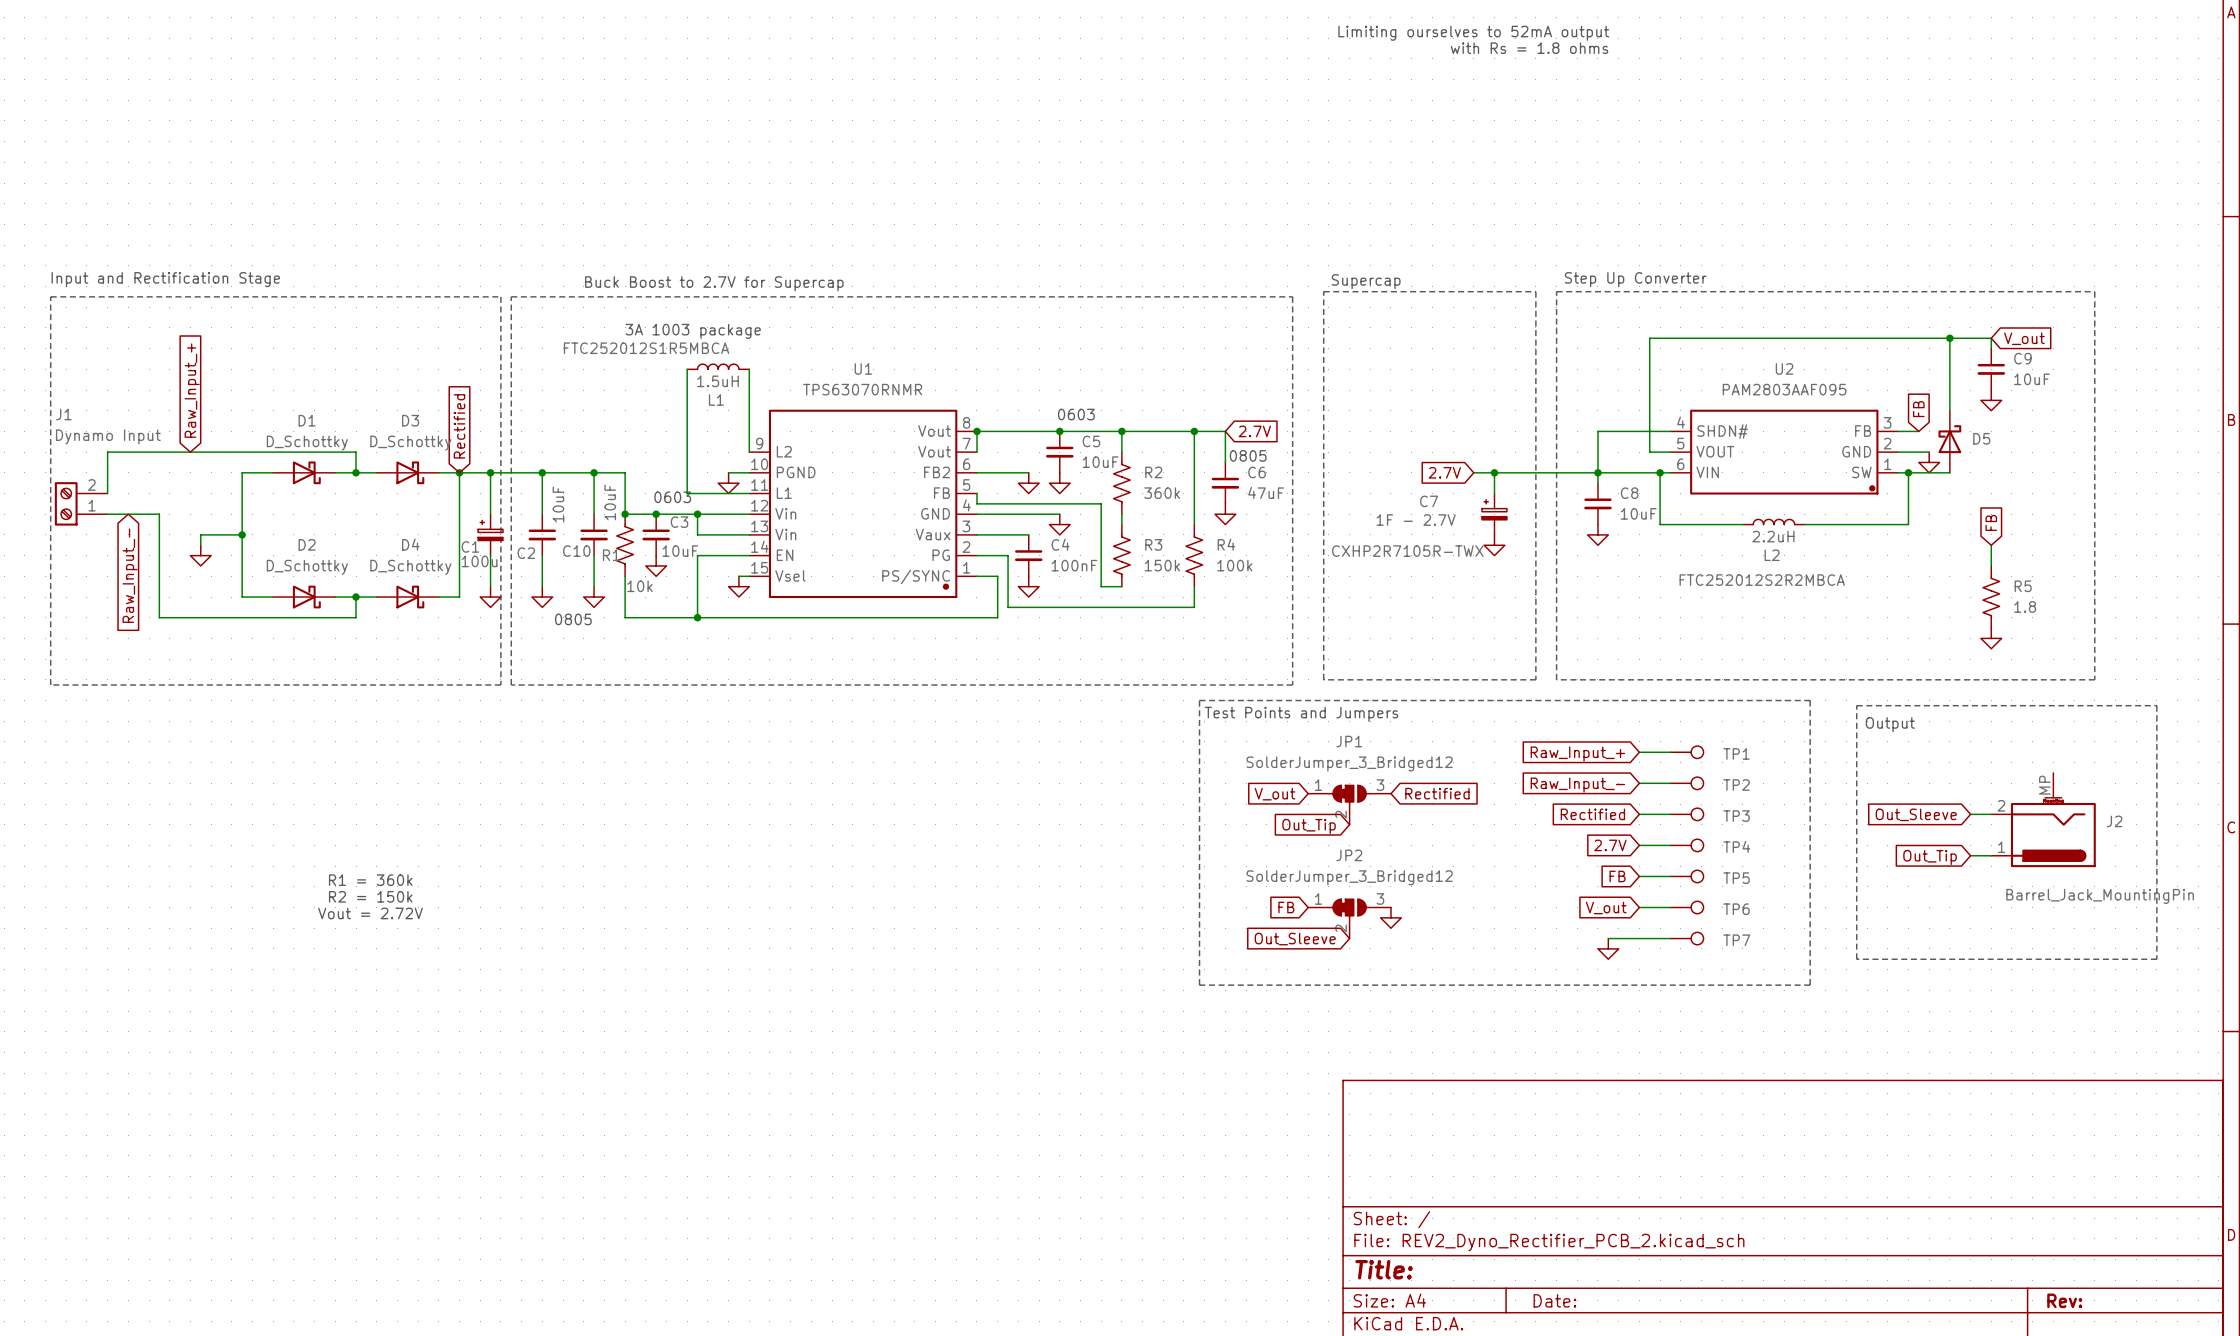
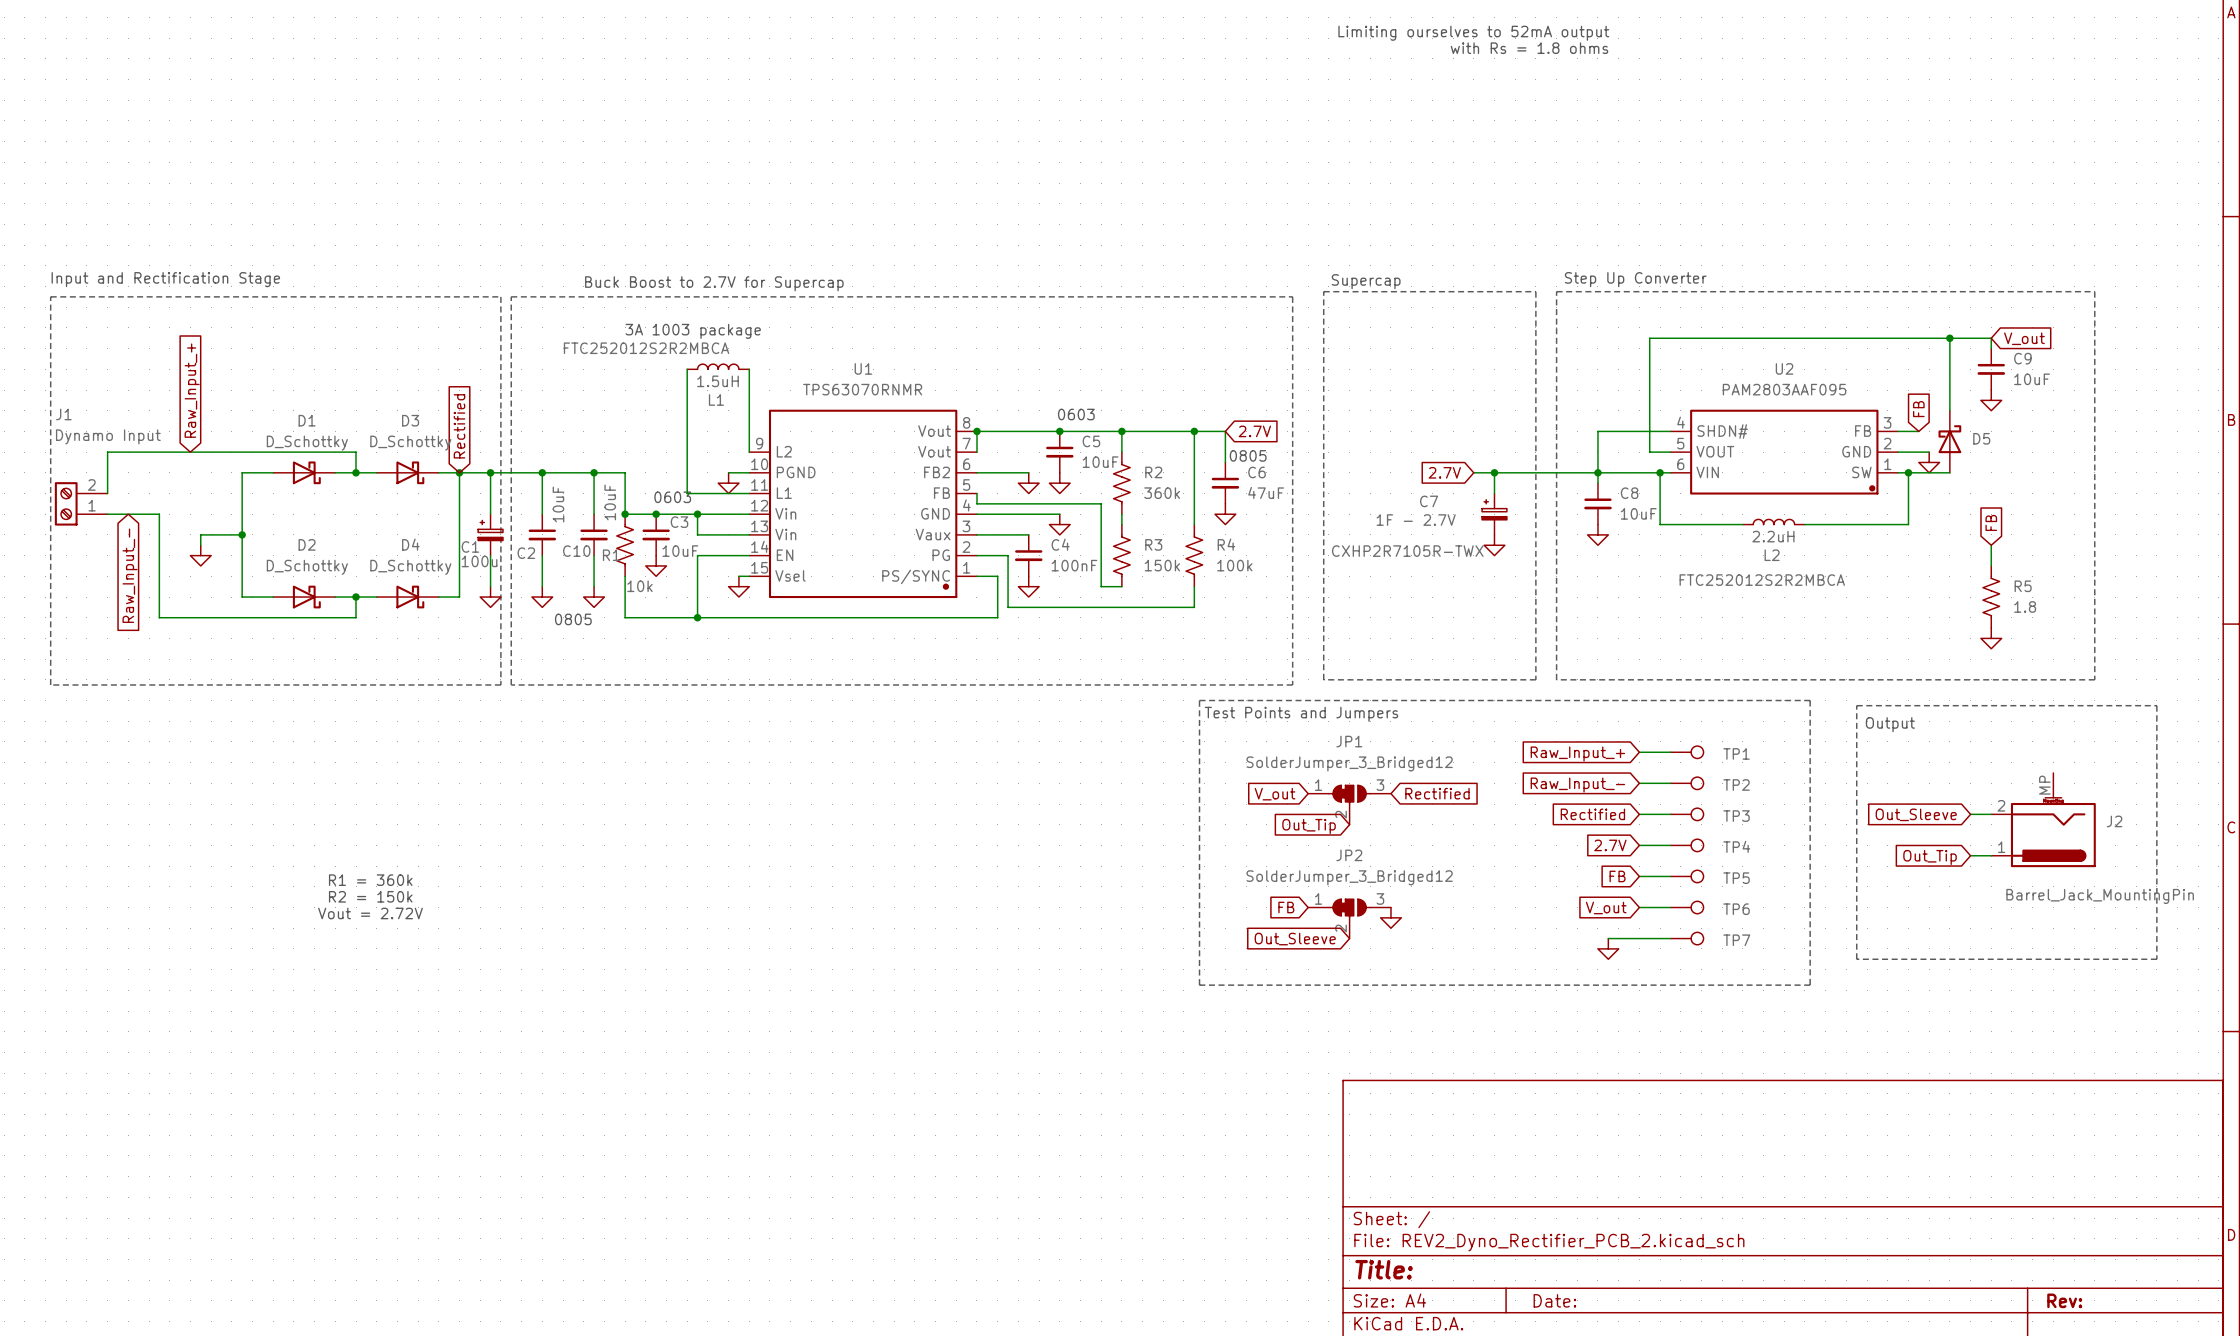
L1 text: FTC252012S1R5MBCA (646, 348) -> FTC252012S2R2MBCA (646, 348)

